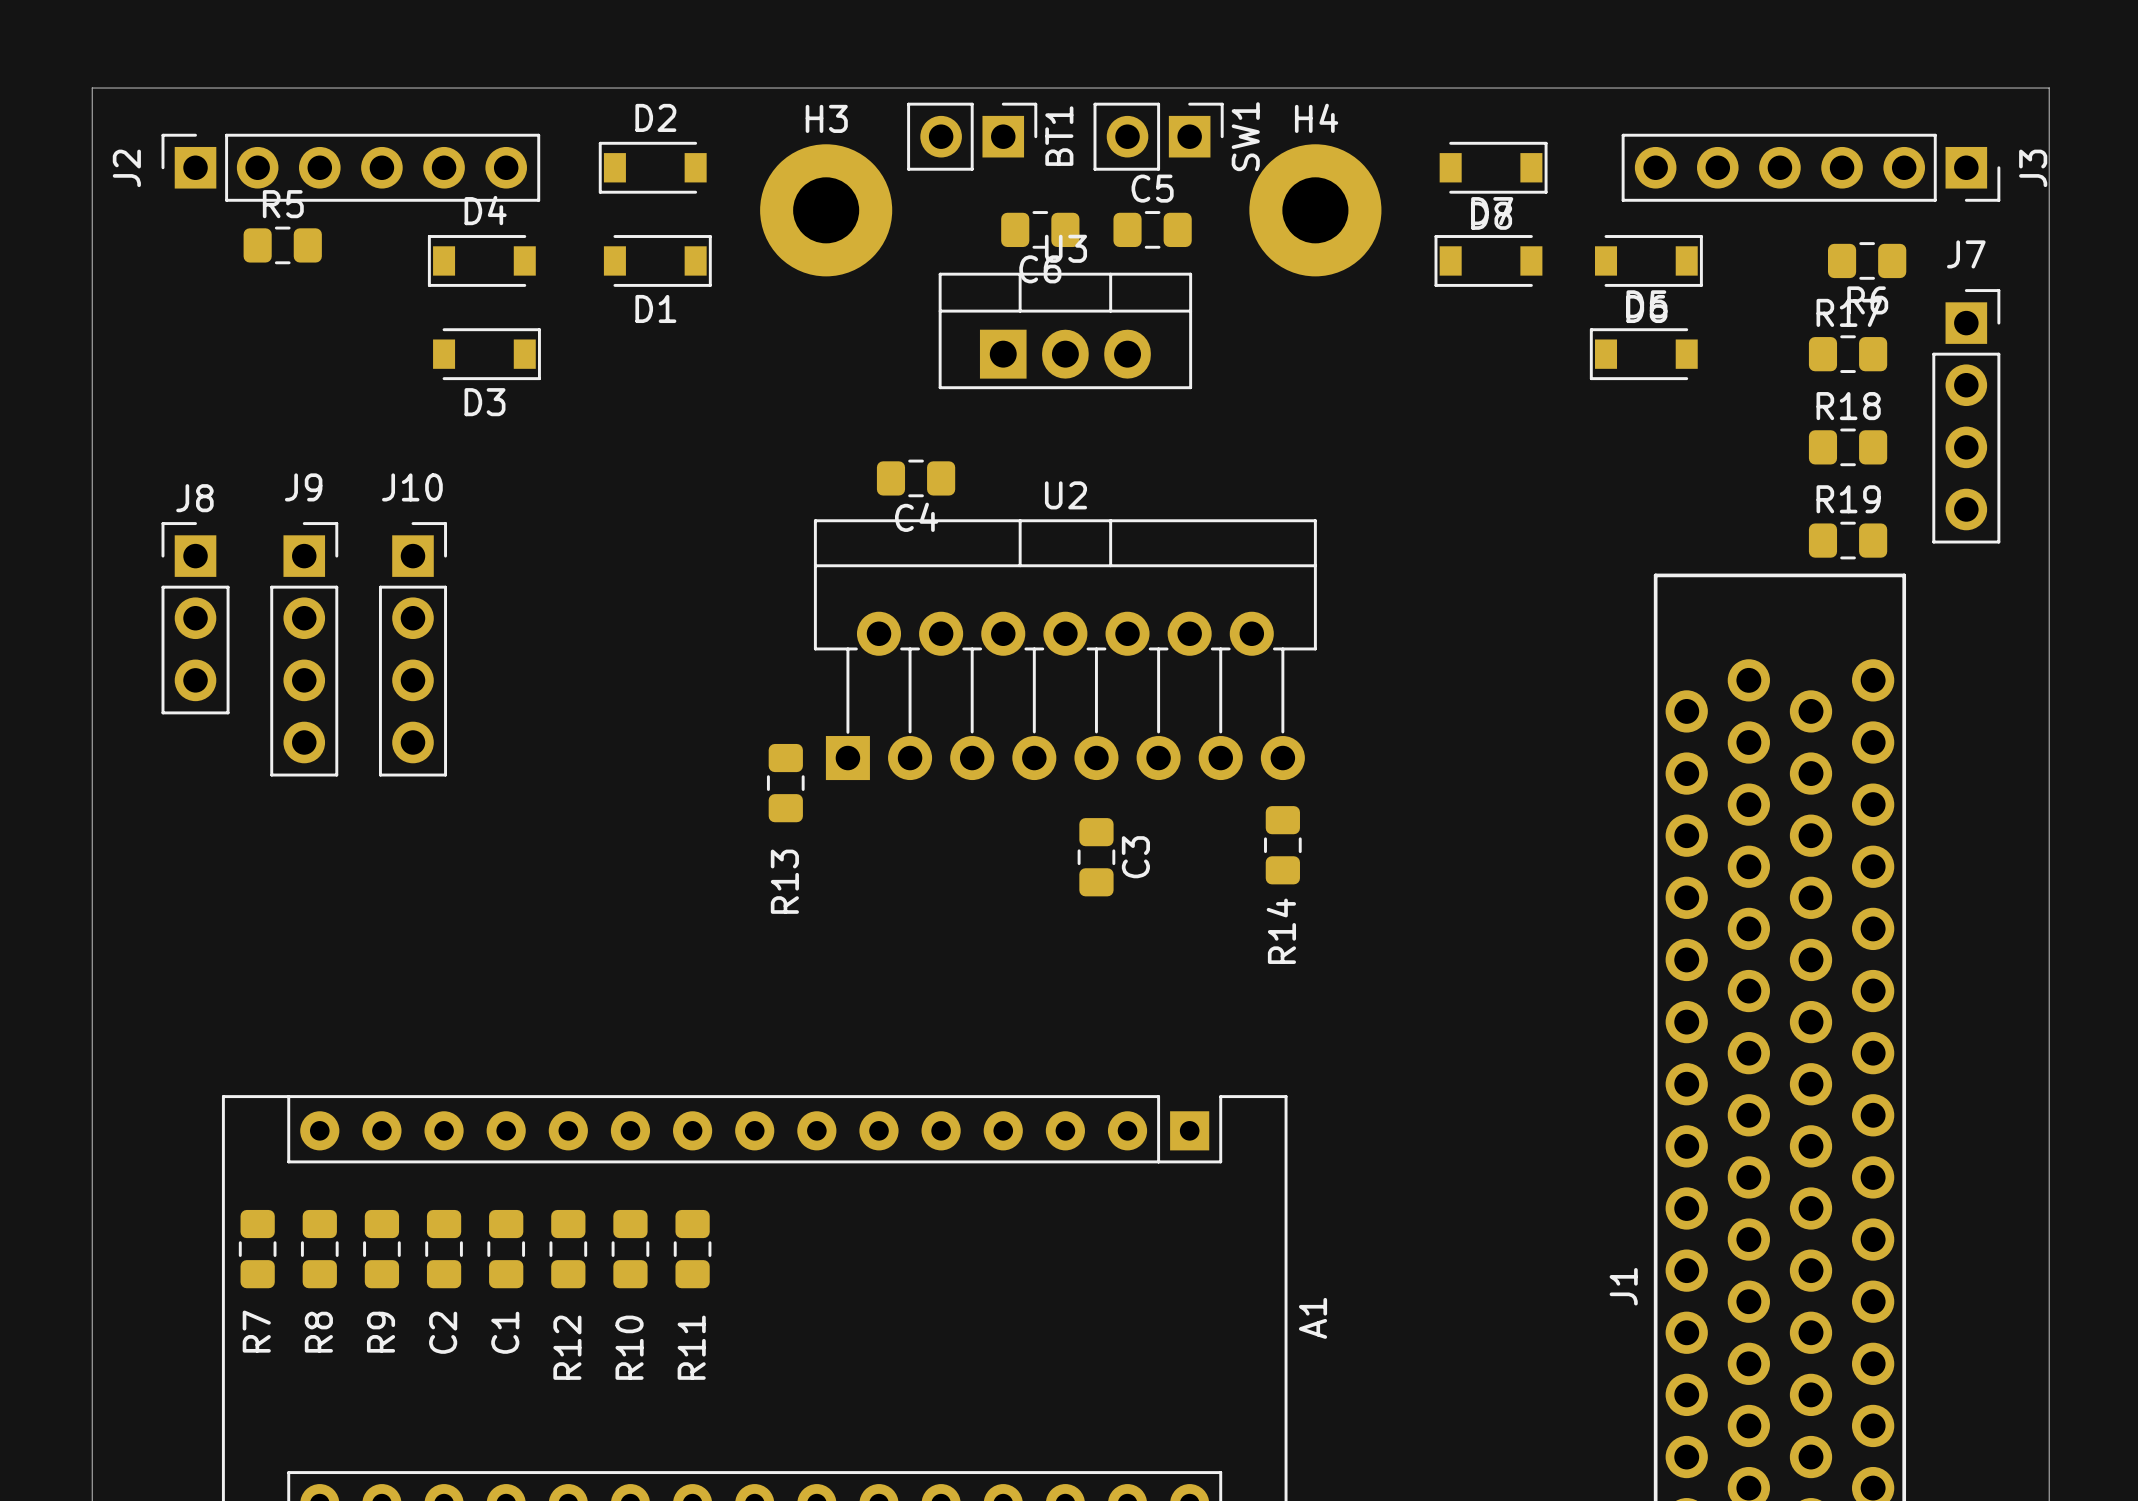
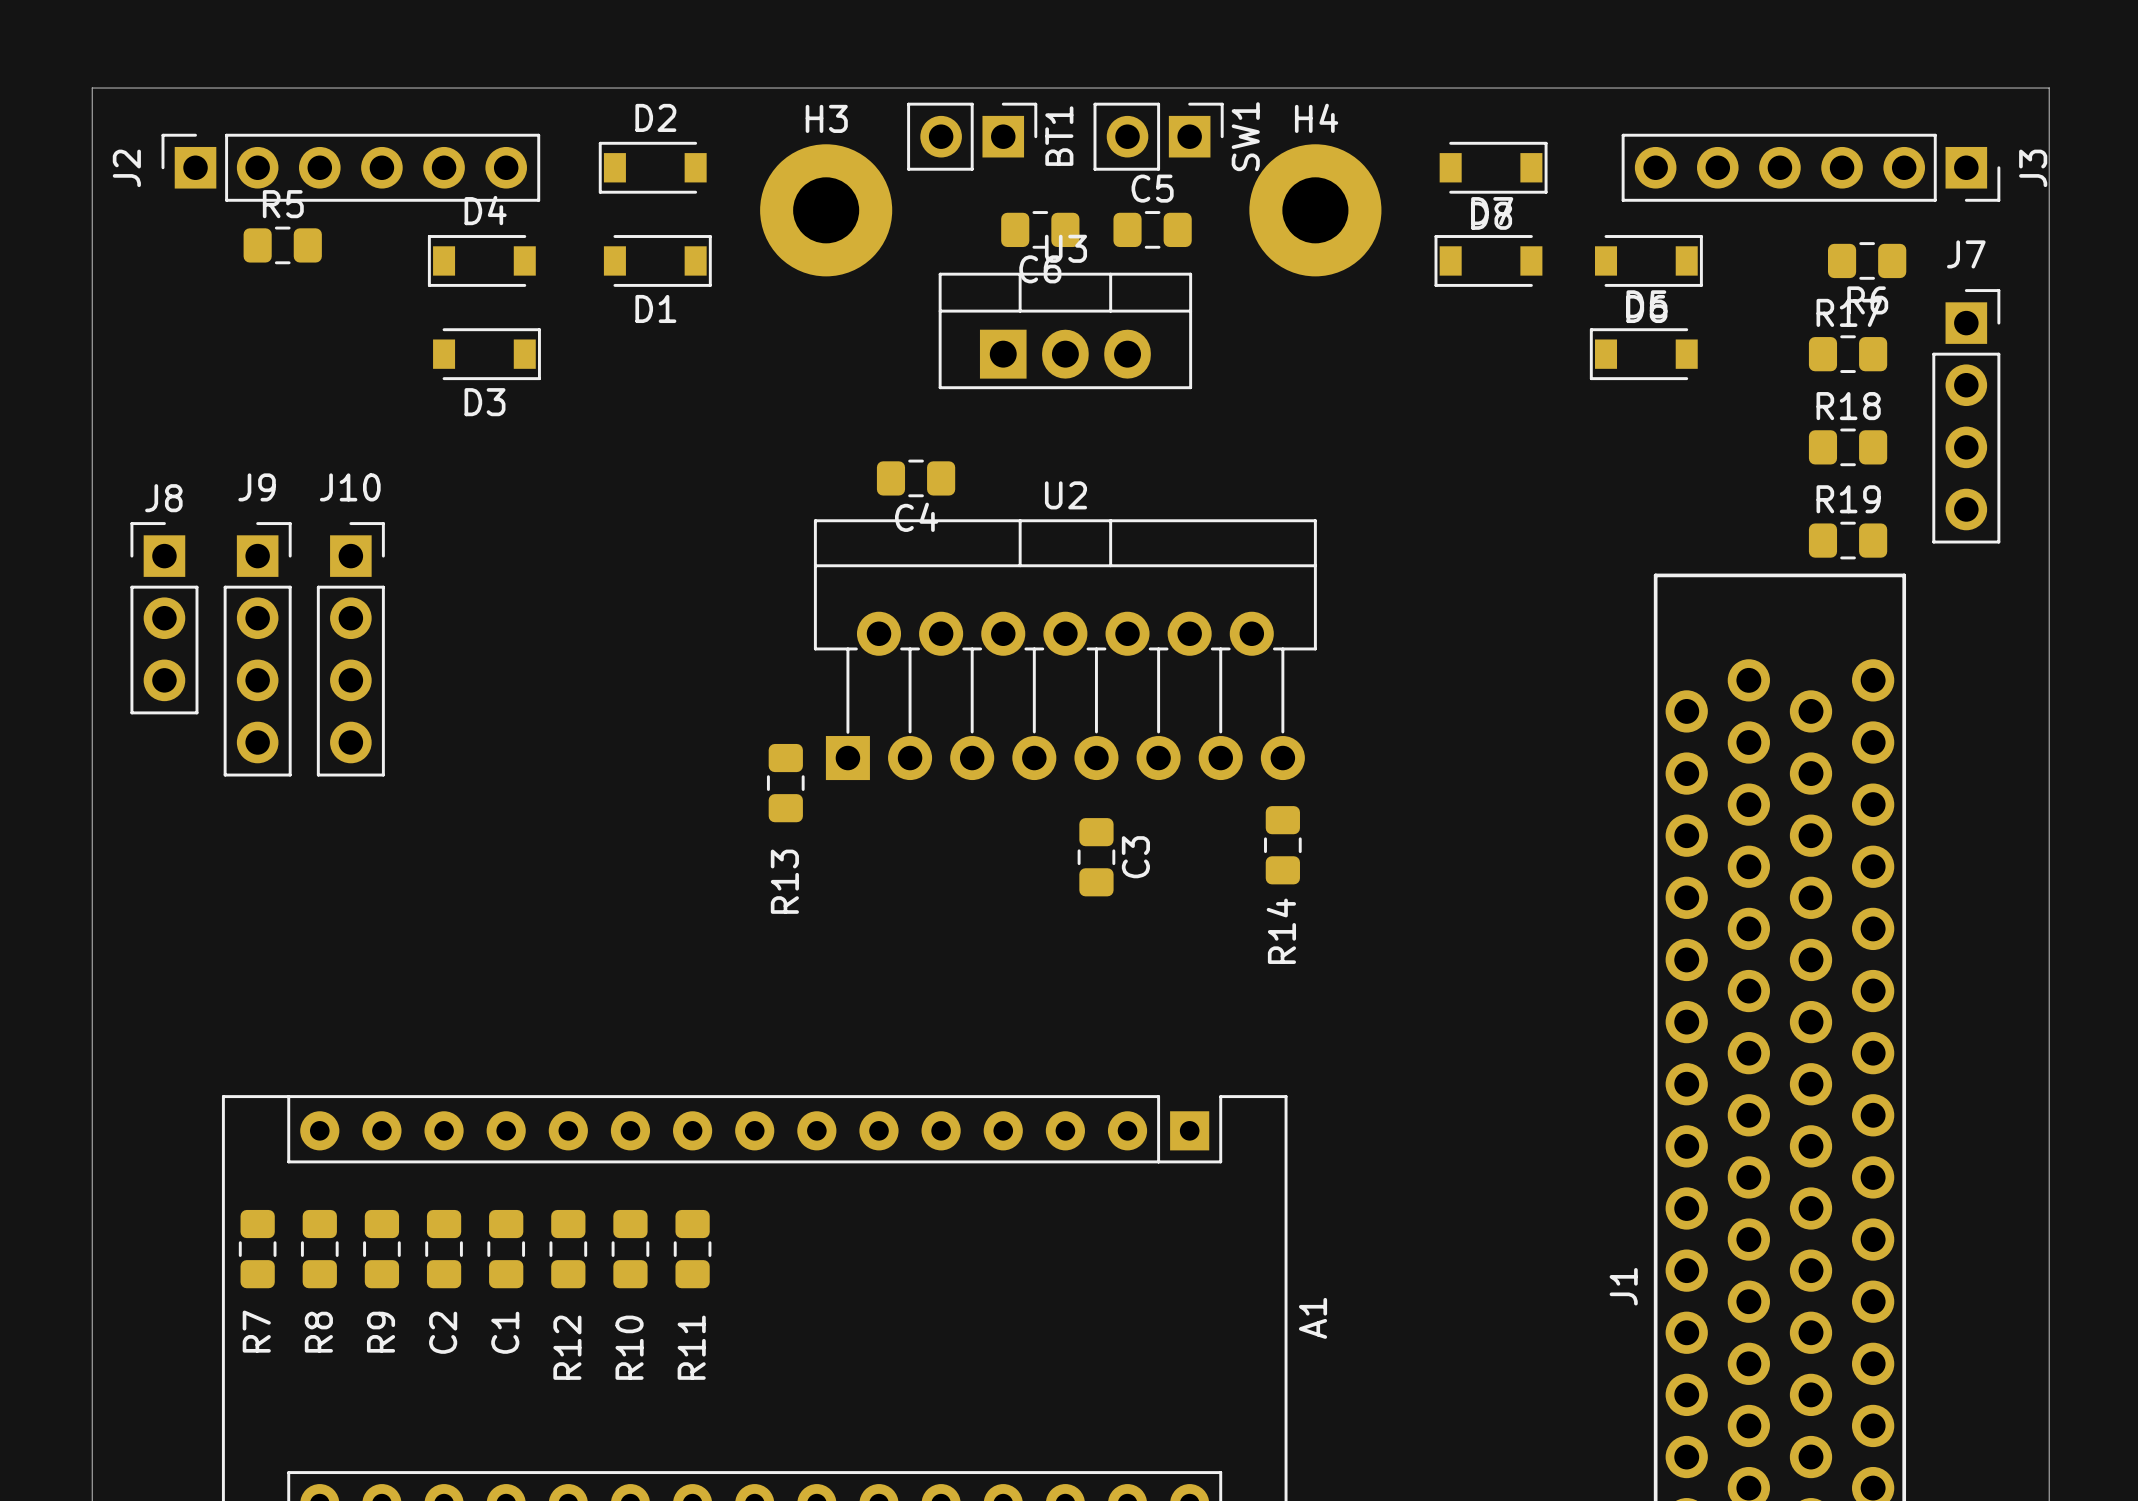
J8 position: (195, 618) -> (164, 618)
J9 position: (304, 649) -> (257, 649)
J10 position: (412, 649) -> (350, 649)

